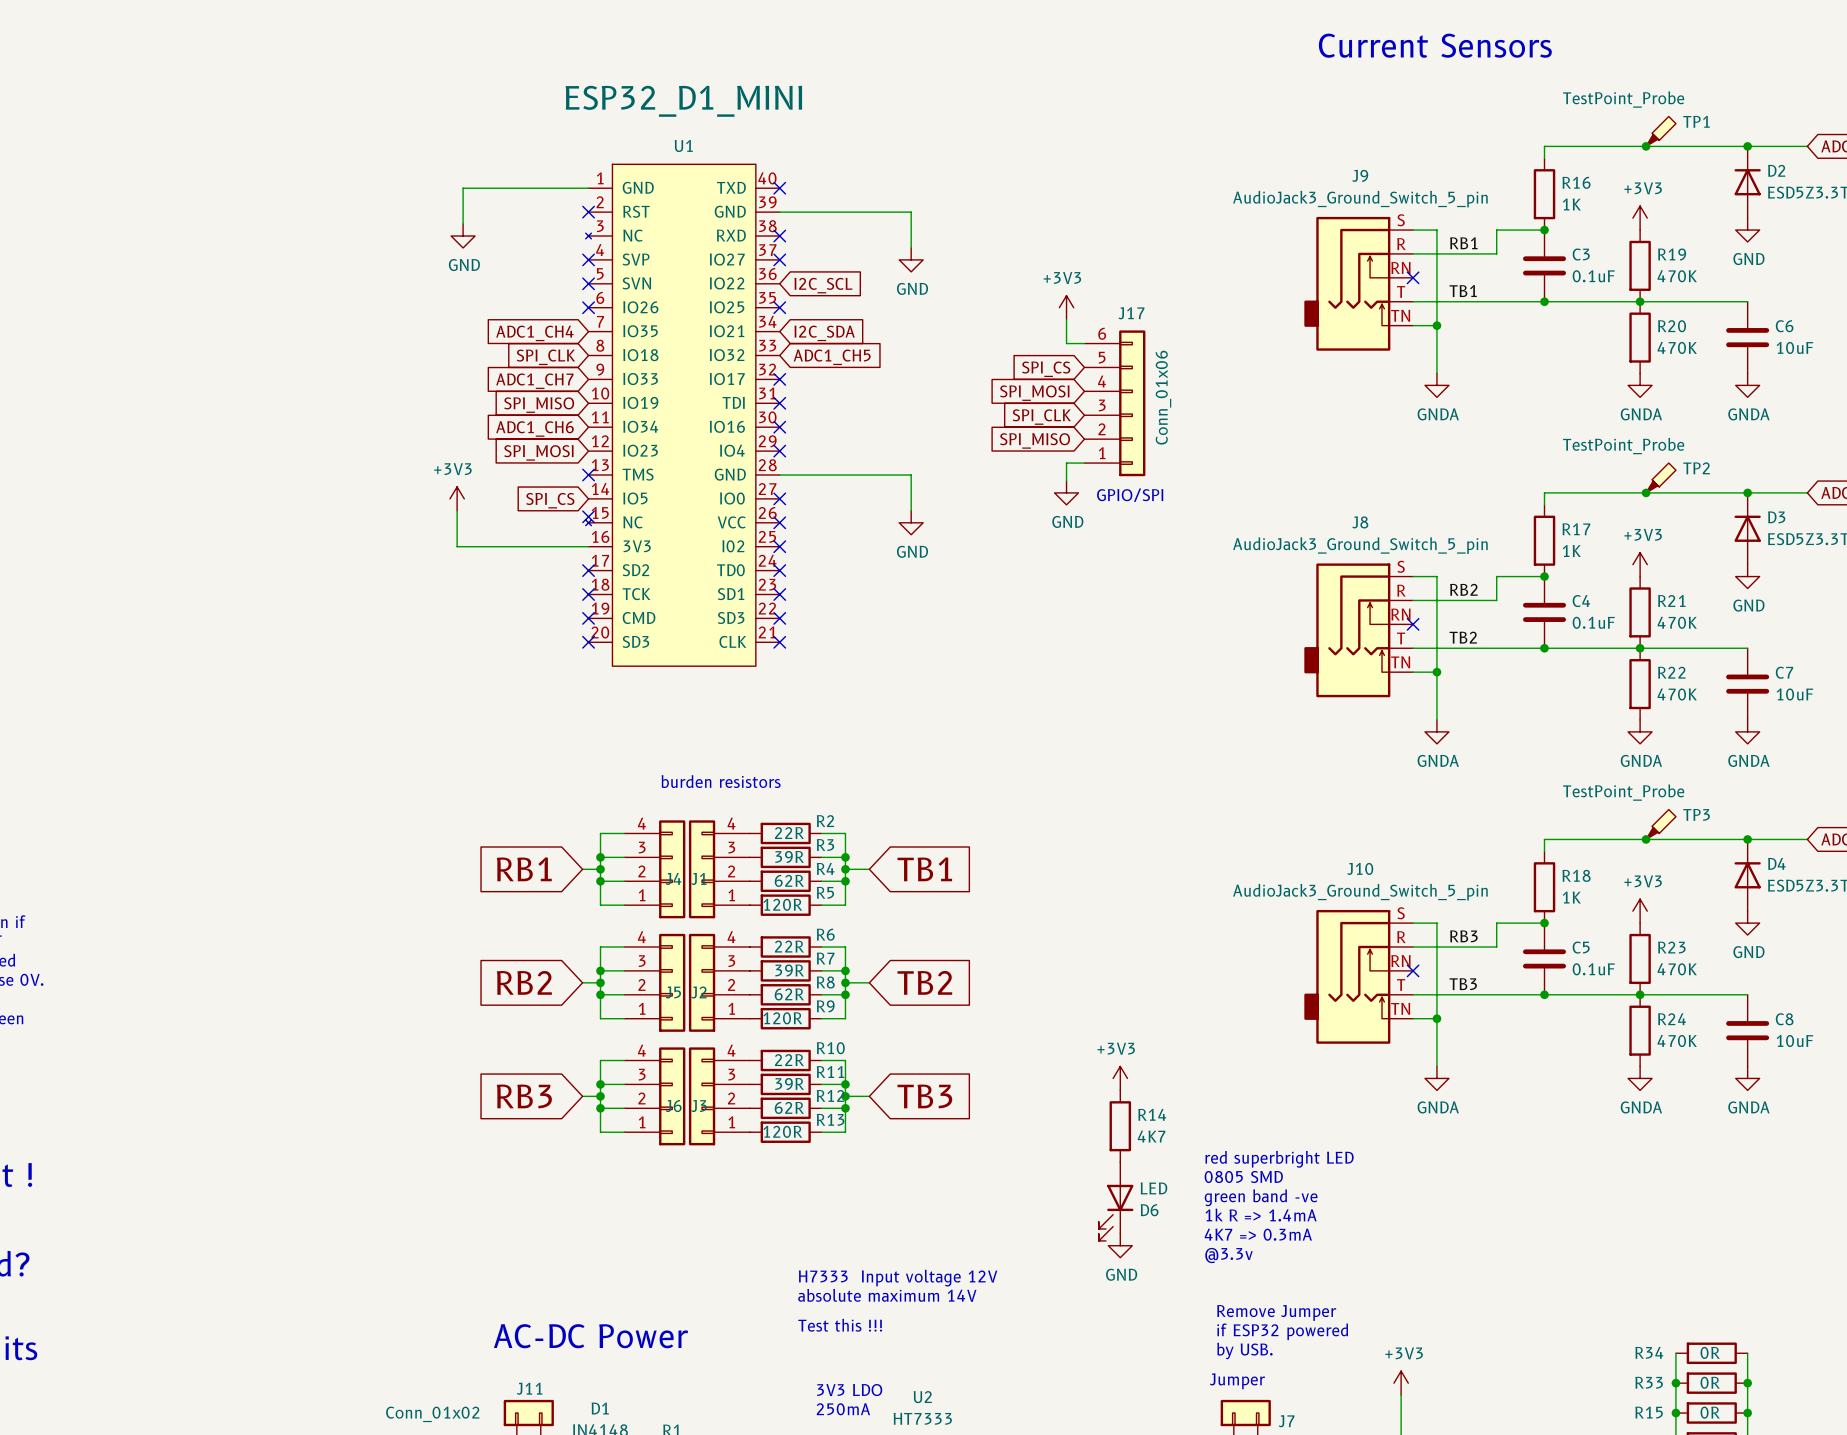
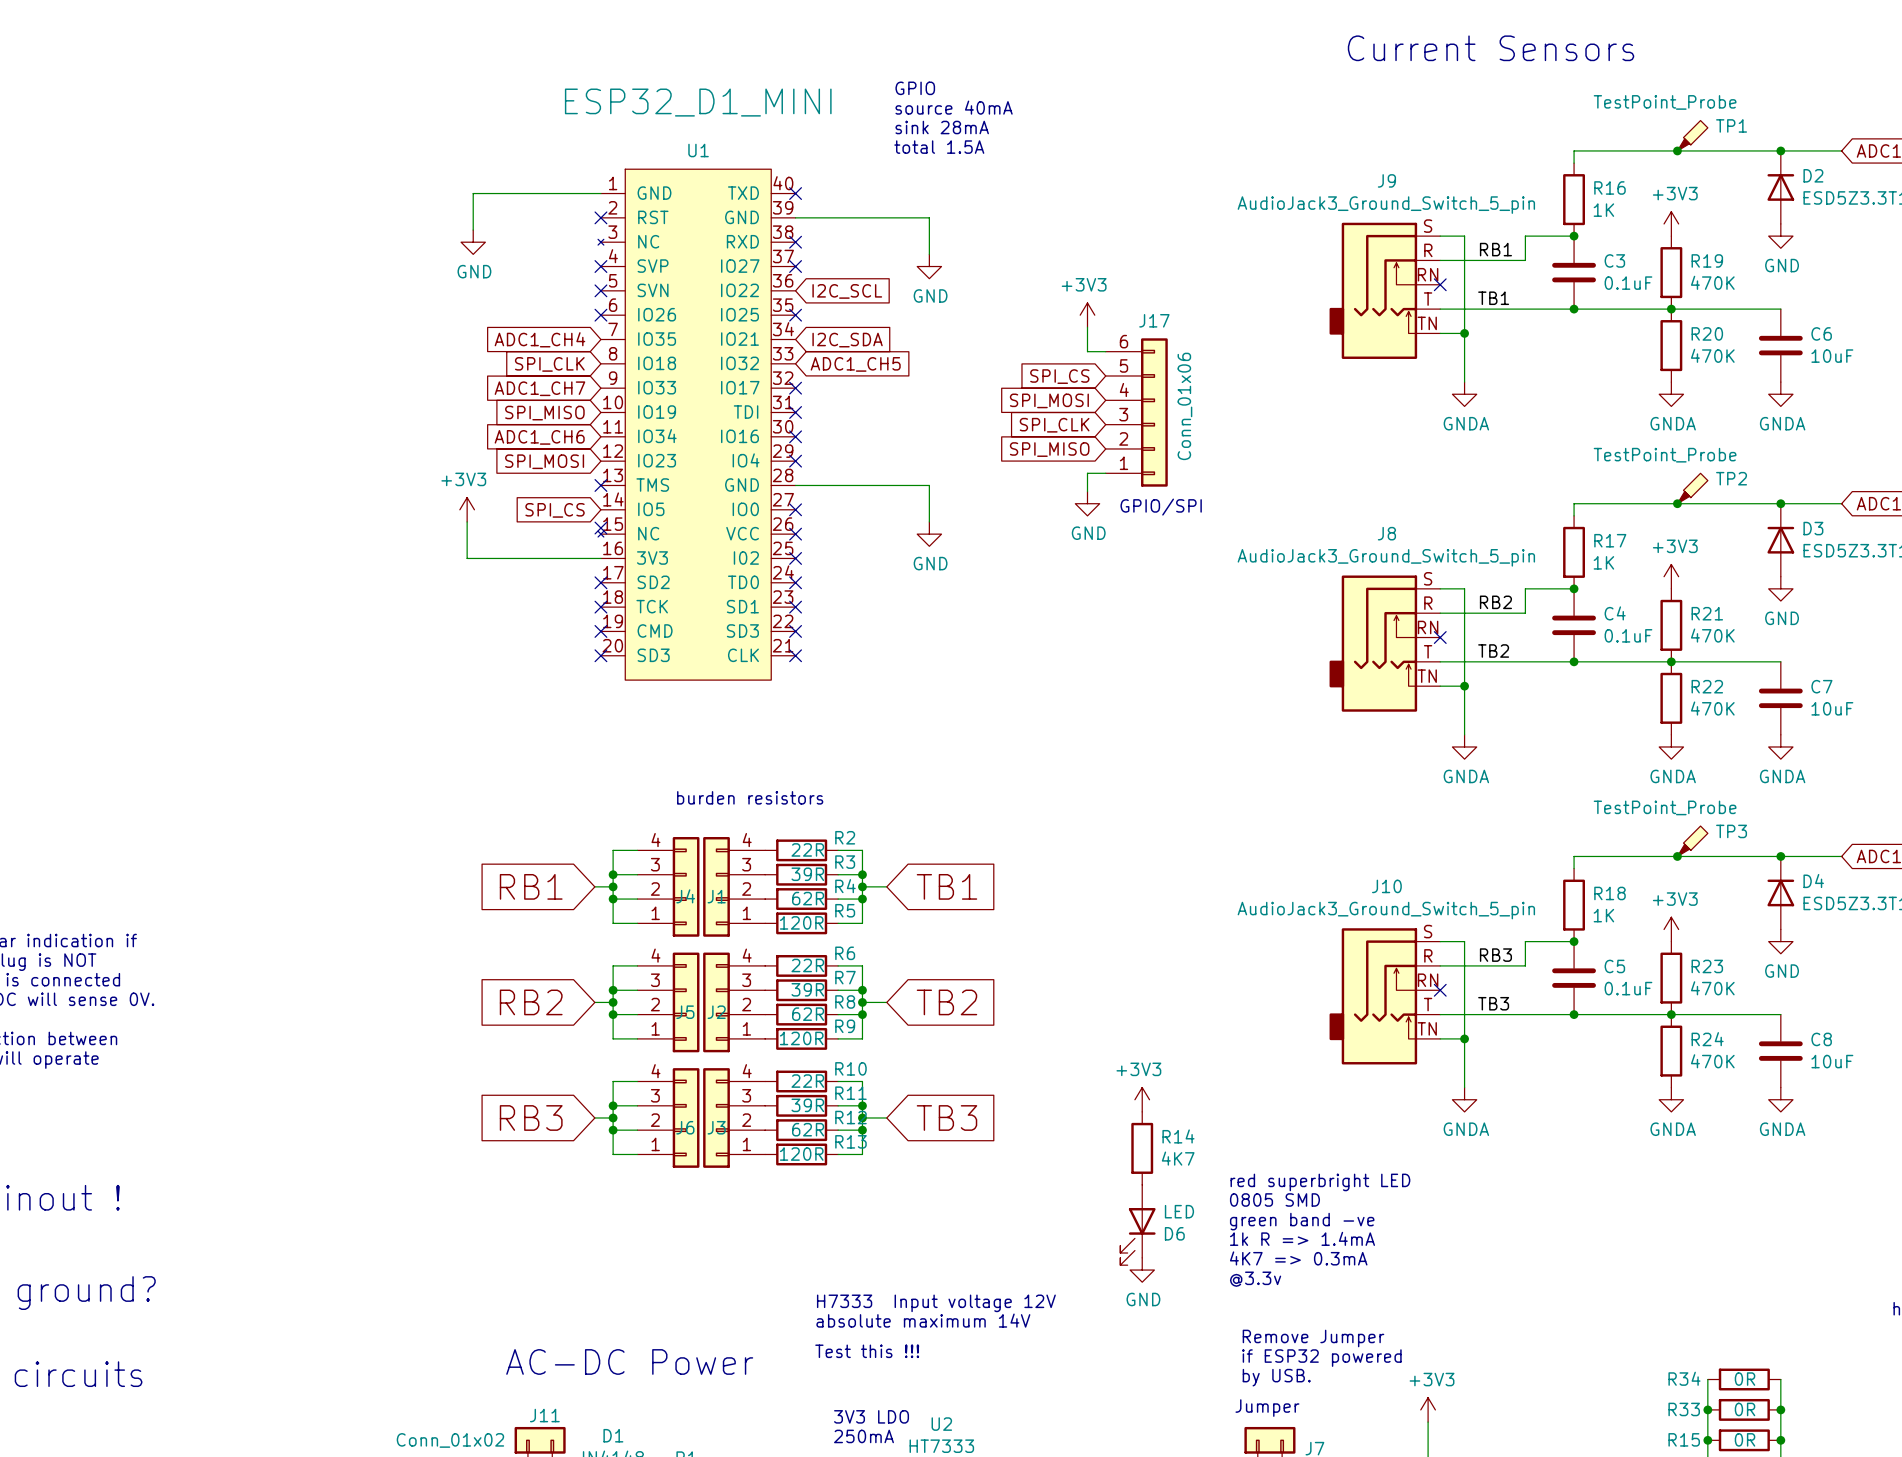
text: none -> GPIO (915, 88)
text: none -> source 40mA (954, 107)
text: none -> sink 28mA (942, 127)
text: none -> total 1.5A (939, 147)

